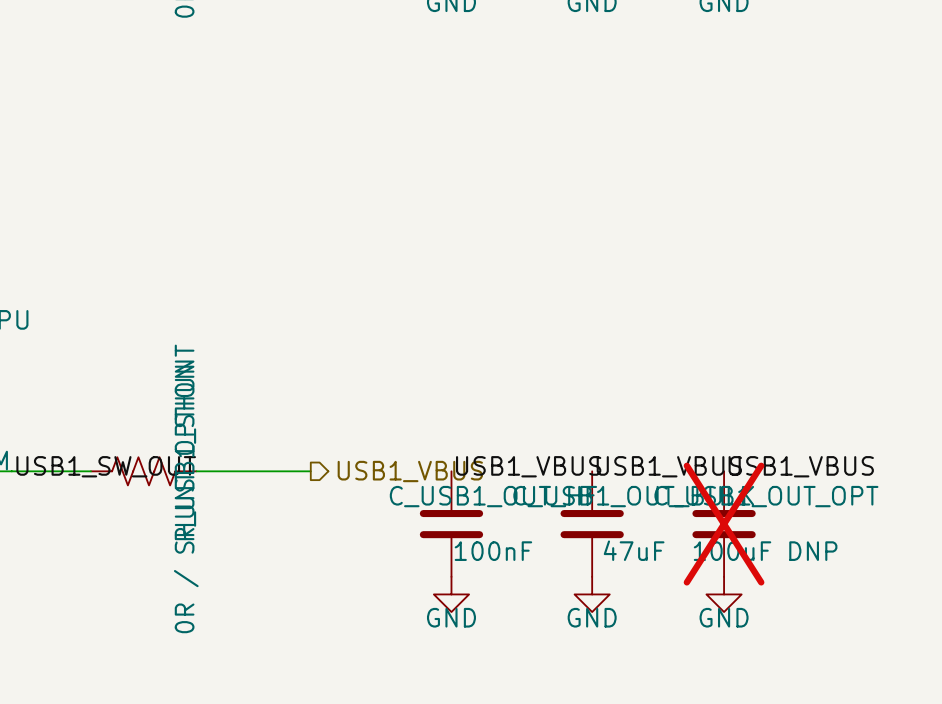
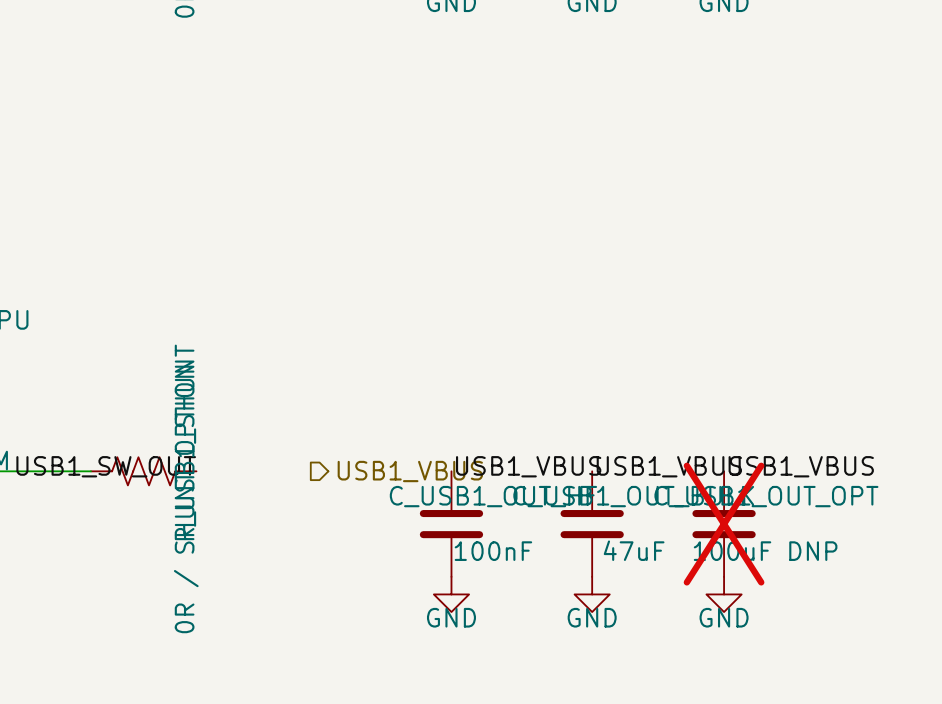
wire: (196, 471) (310, 471) -> none

